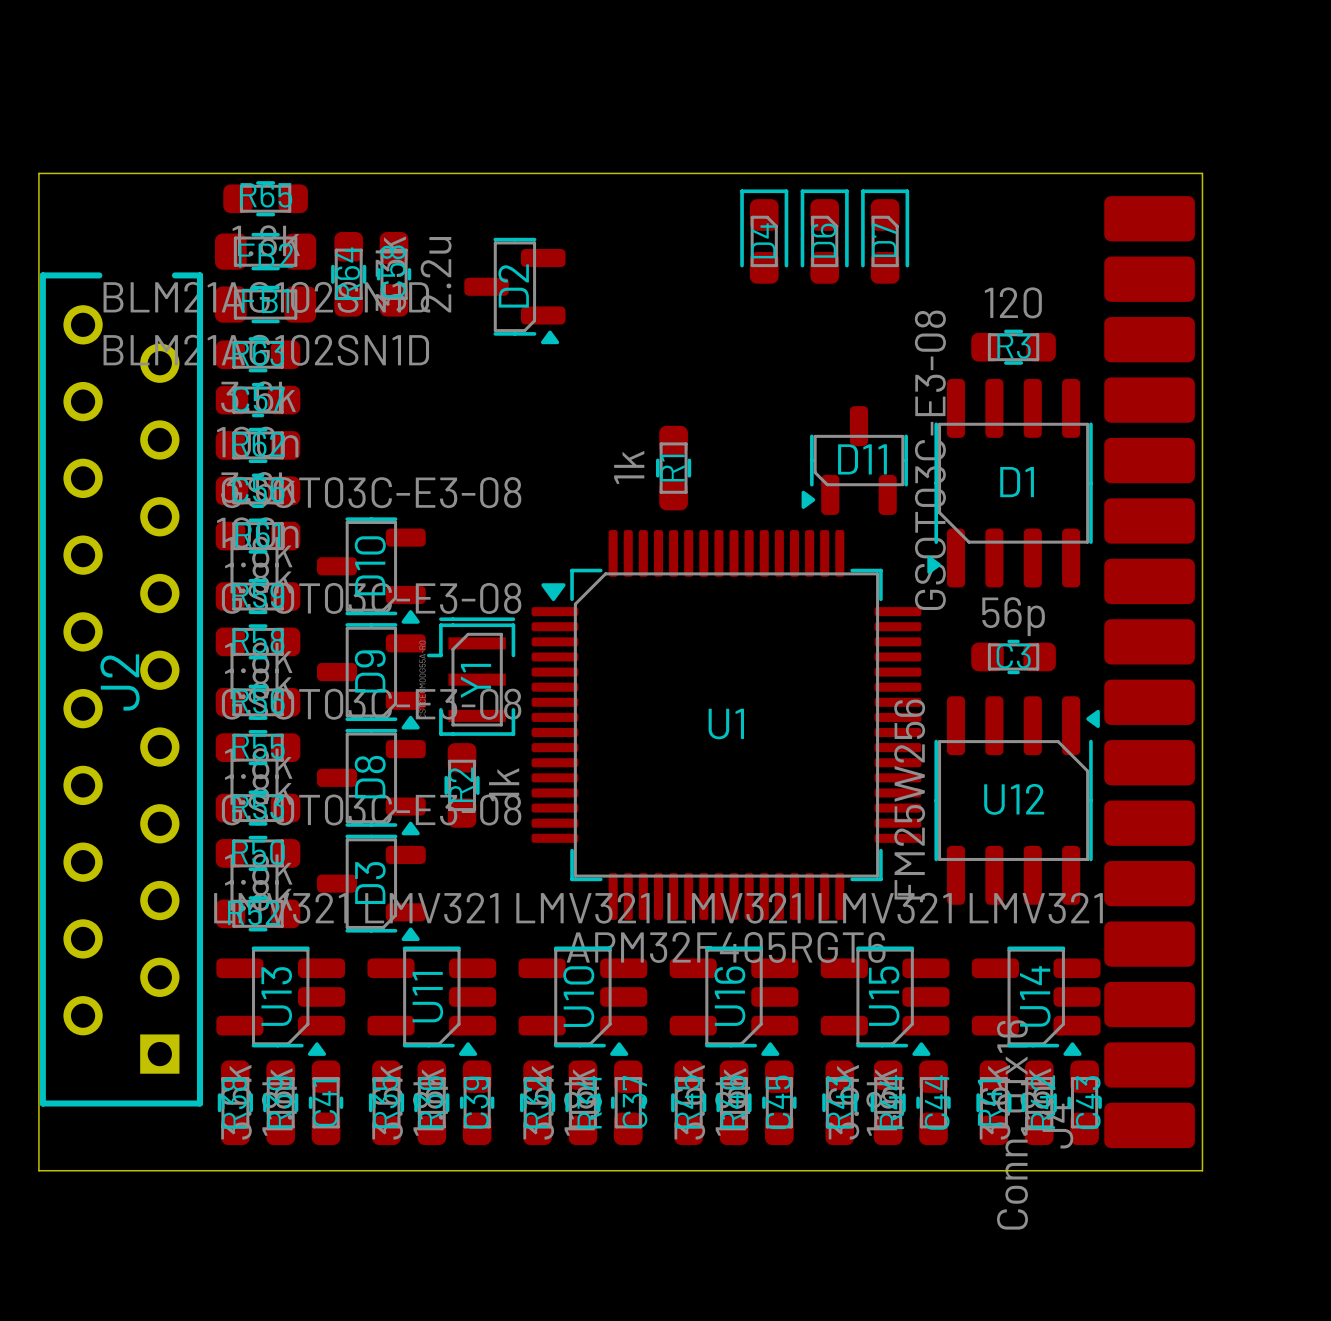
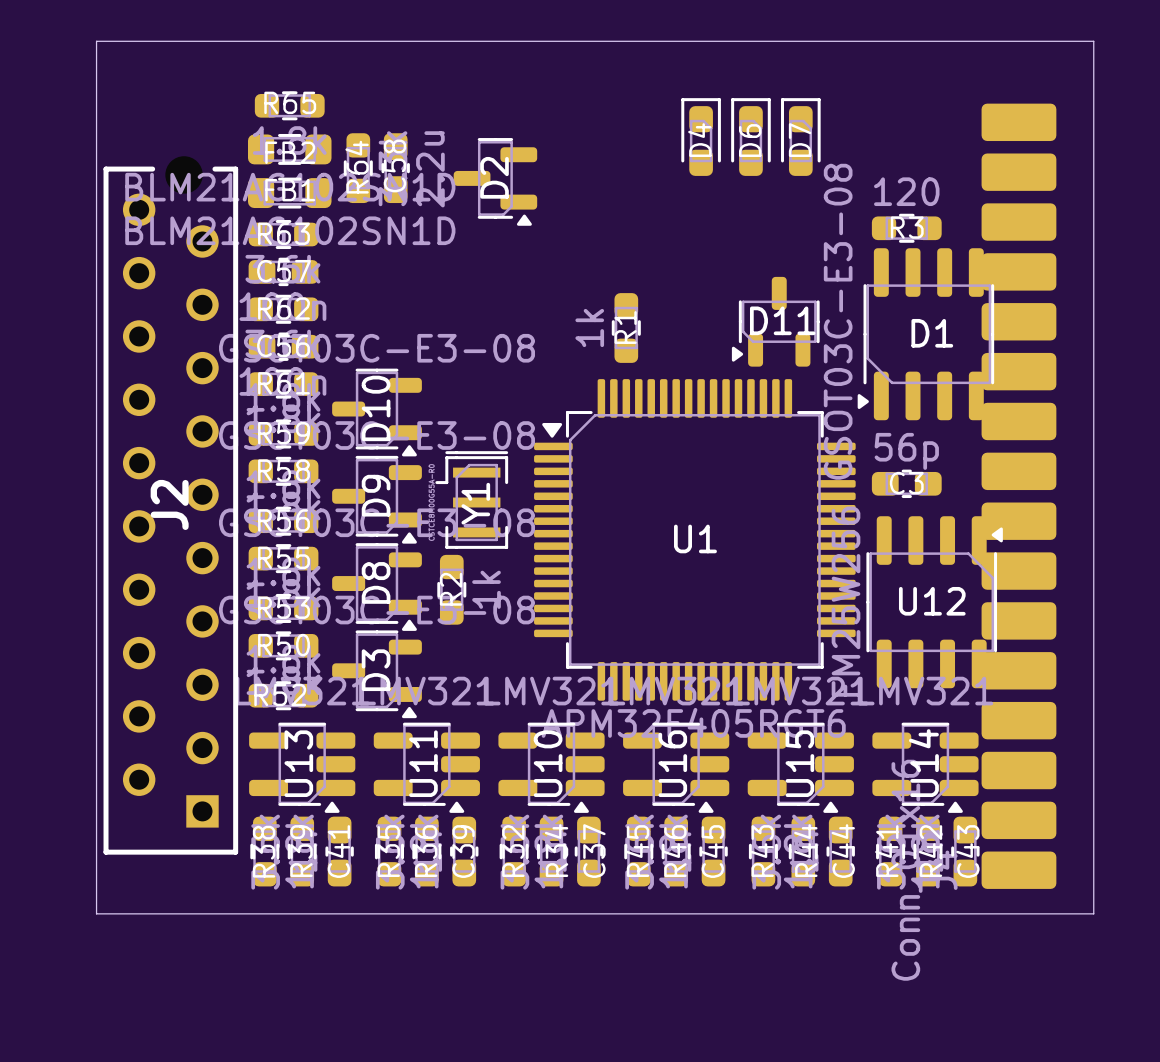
board edge: (38, 173) (1202, 173) (1202, 1170) (38, 1170) (38, 173) -> (96, 41) (96, 913) (1093, 913) (1093, 41) (96, 41)
D1 position: (1010, 483) -> (925, 334)
Y1 position: (471, 676) -> (471, 500)
U1 position: (726, 724) -> (694, 539)
U12 position: (1017, 800) -> (934, 602)

